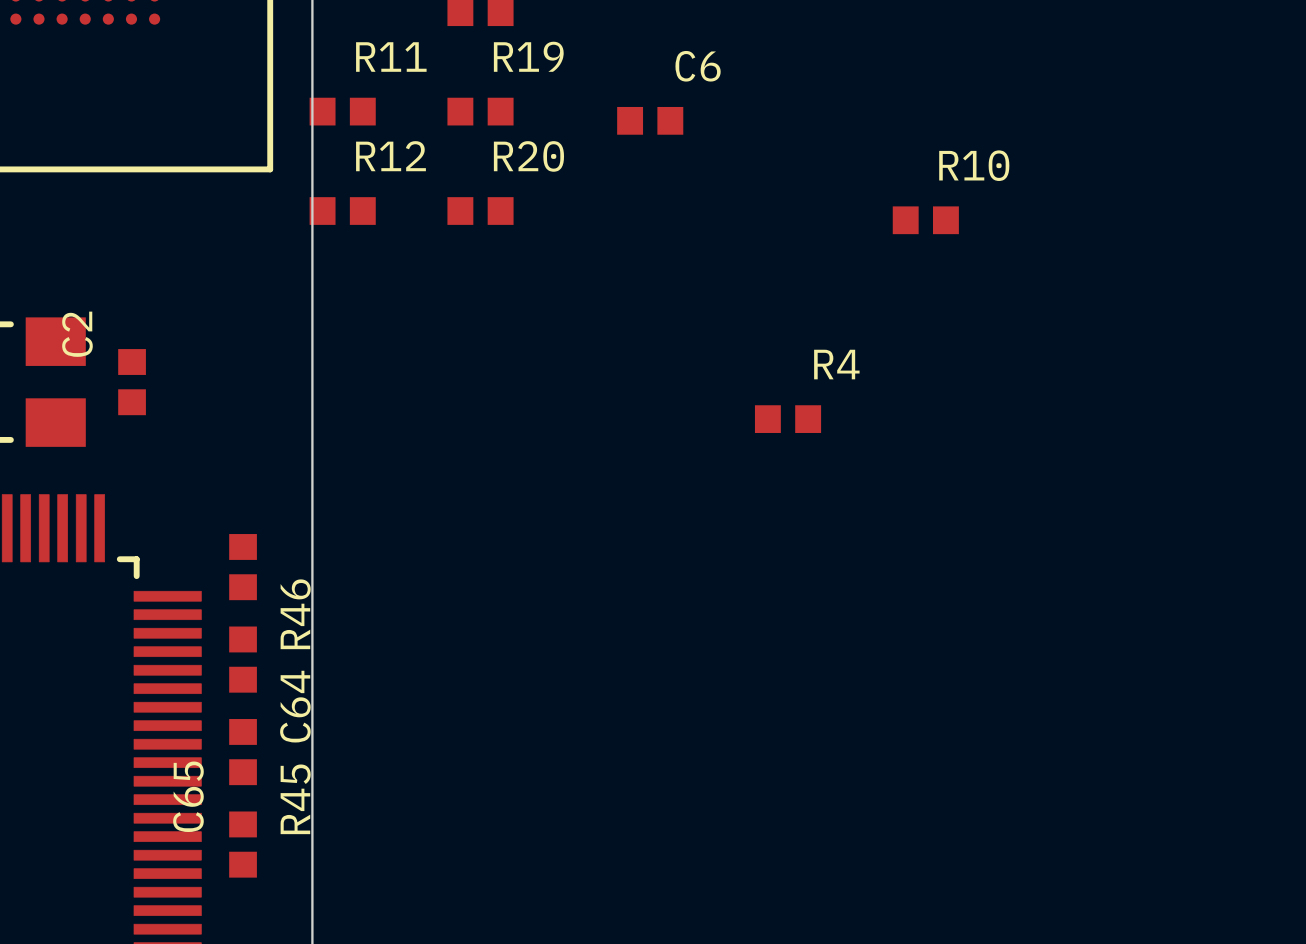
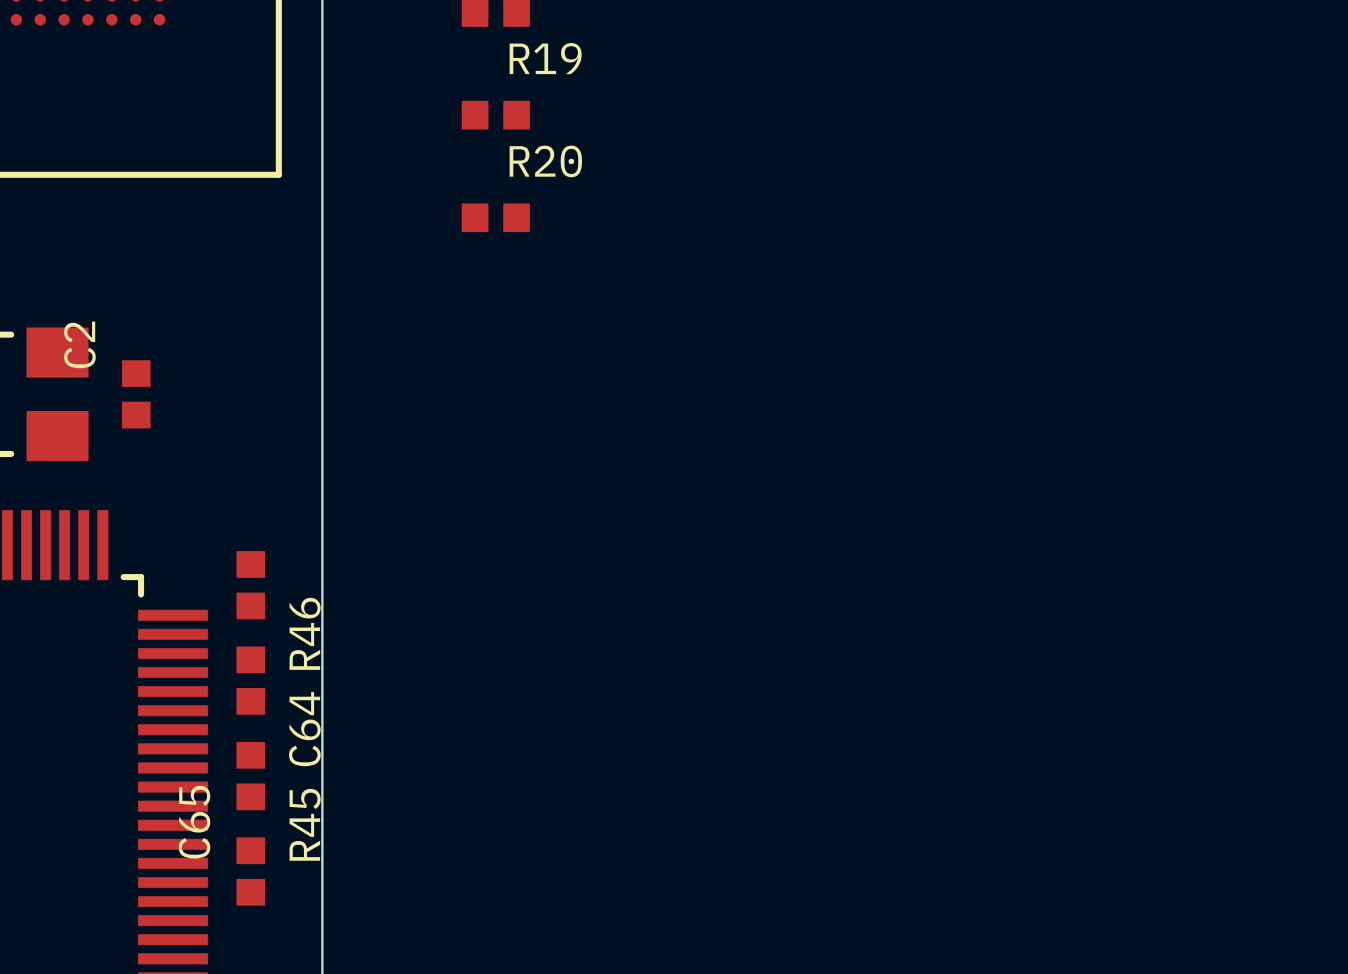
R11: (342, 111) -> none
C6: (650, 120) -> none
R12: (342, 211) -> none
R10: (925, 220) -> none
R4: (788, 419) -> none

